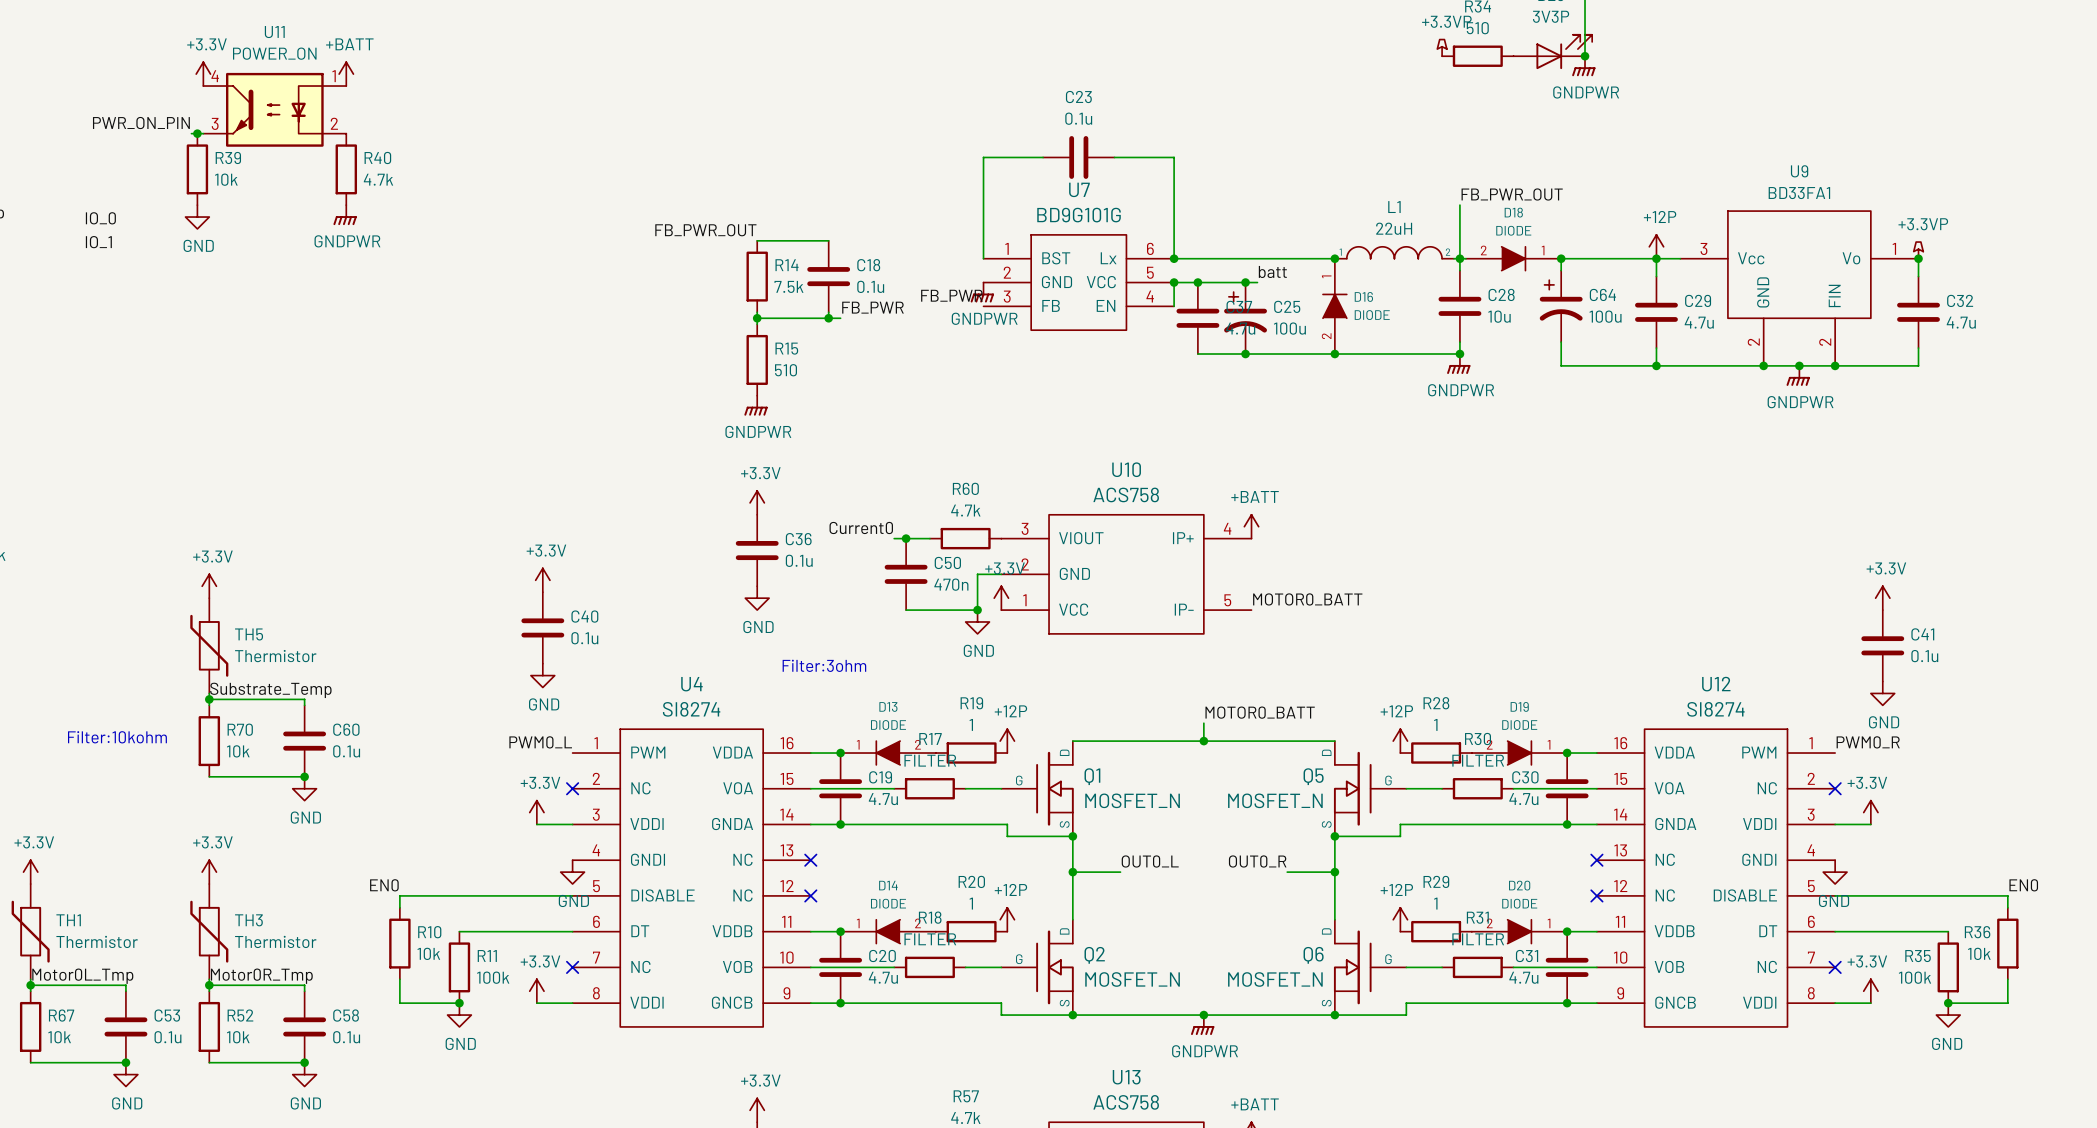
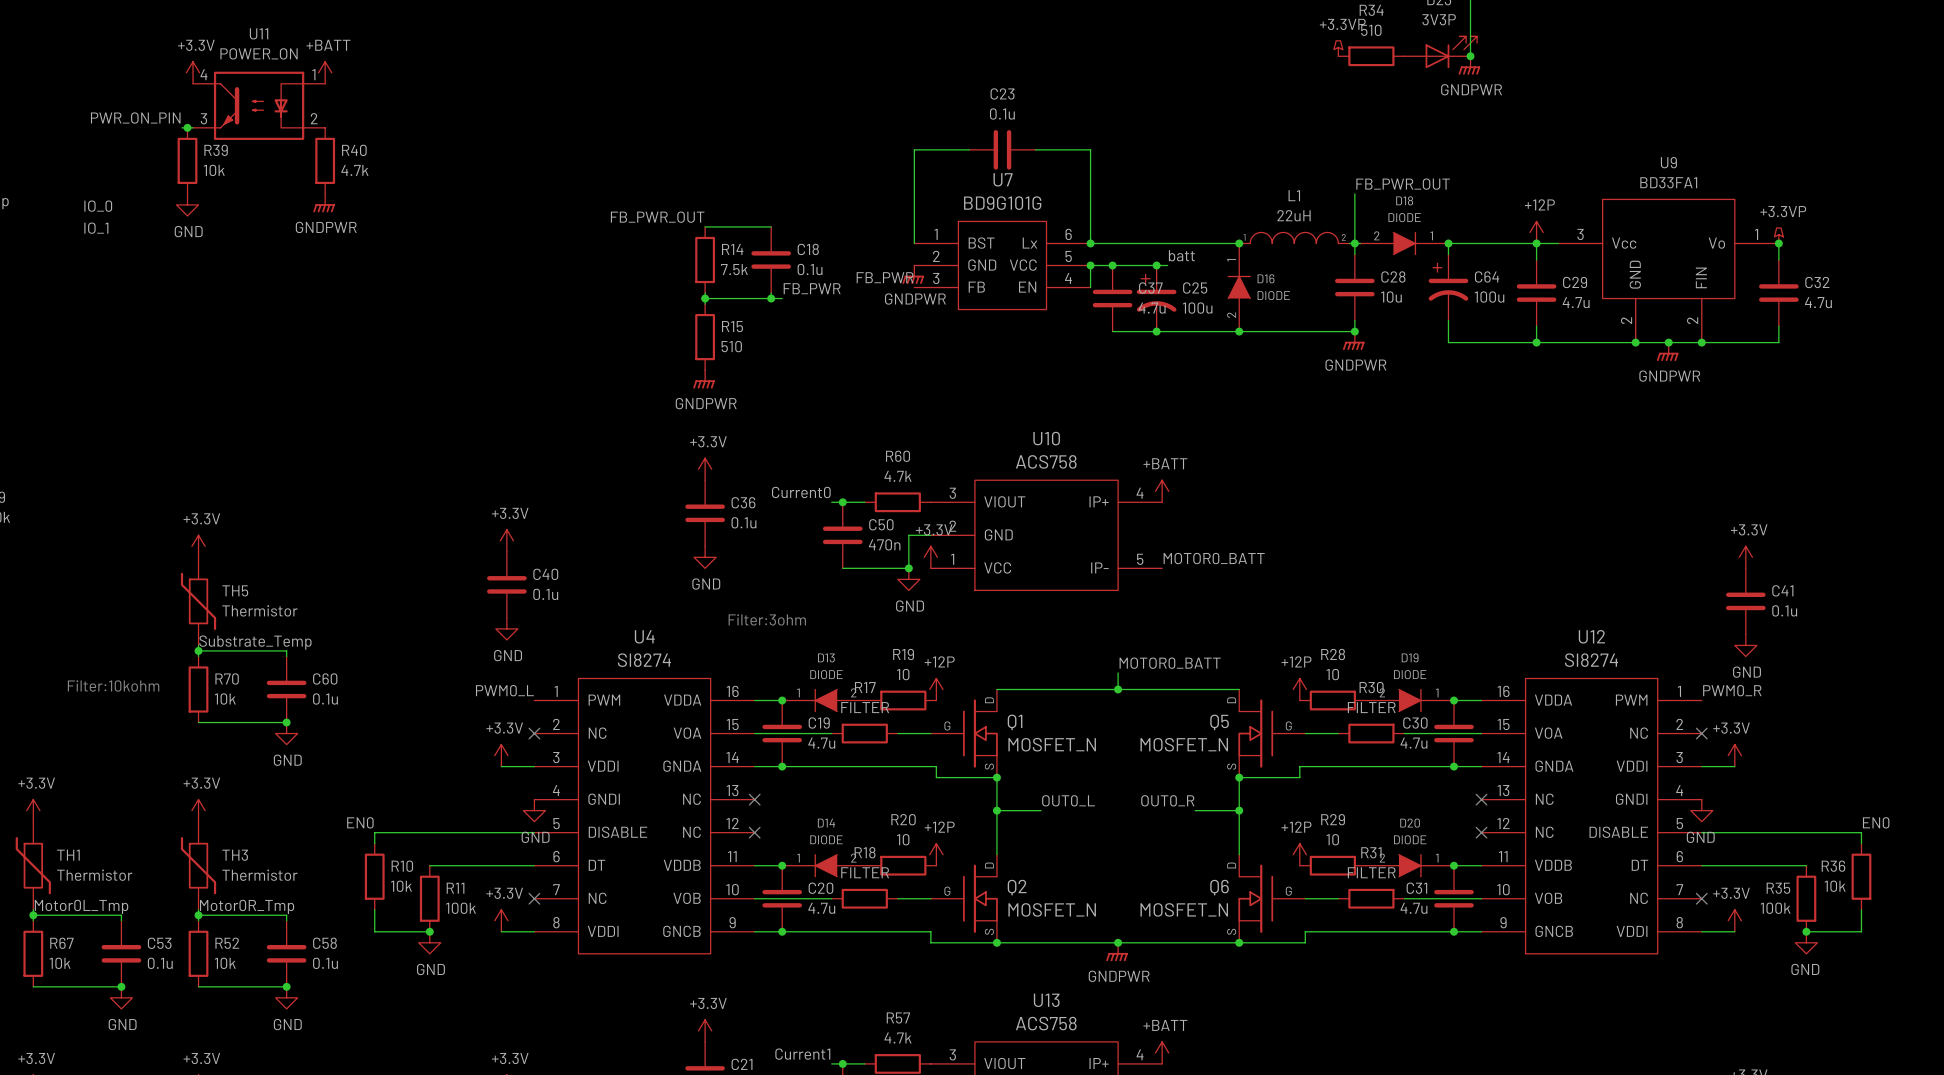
R19 value: 1 (971, 724) -> 10 (903, 674)
R28 value: 1 (1435, 724) -> 10 (1332, 674)
R20 value: 1 (971, 903) -> 10 (903, 839)
R29 value: 1 (1435, 903) -> 10 (1332, 839)

